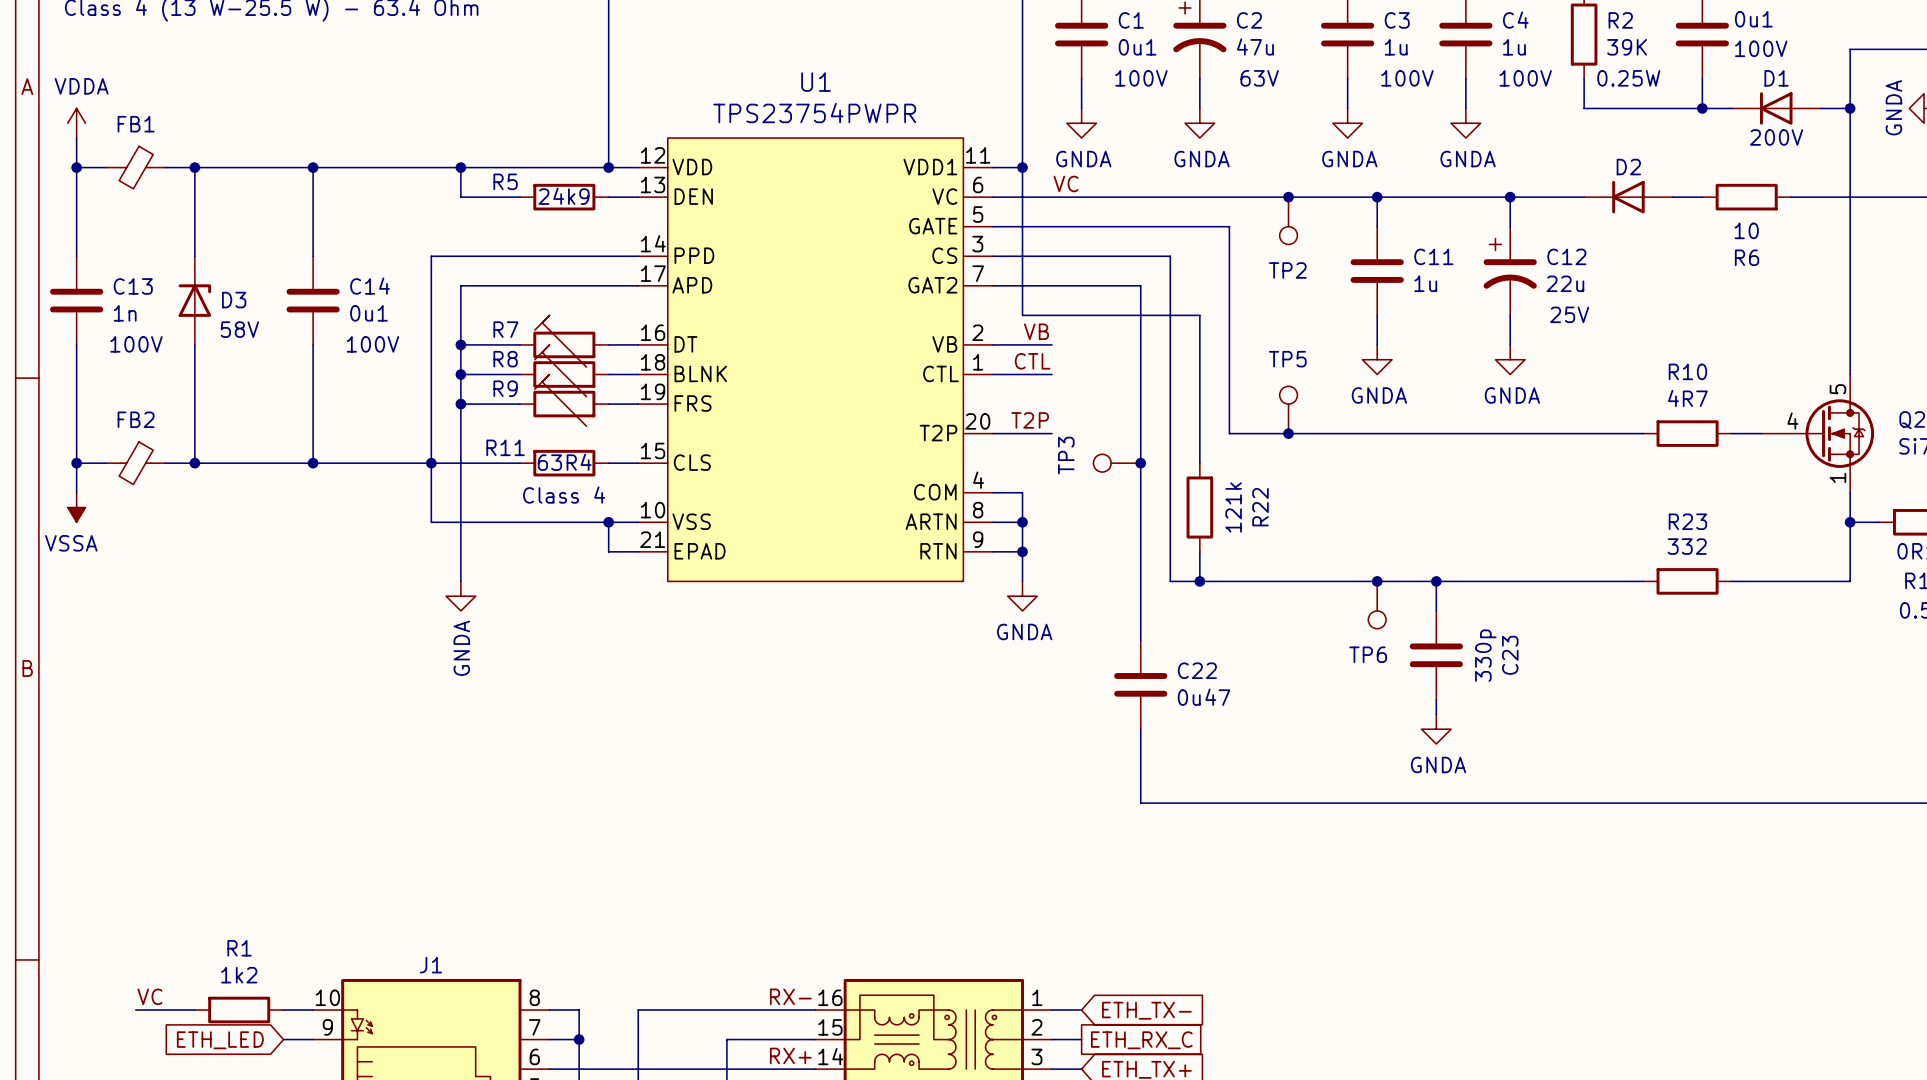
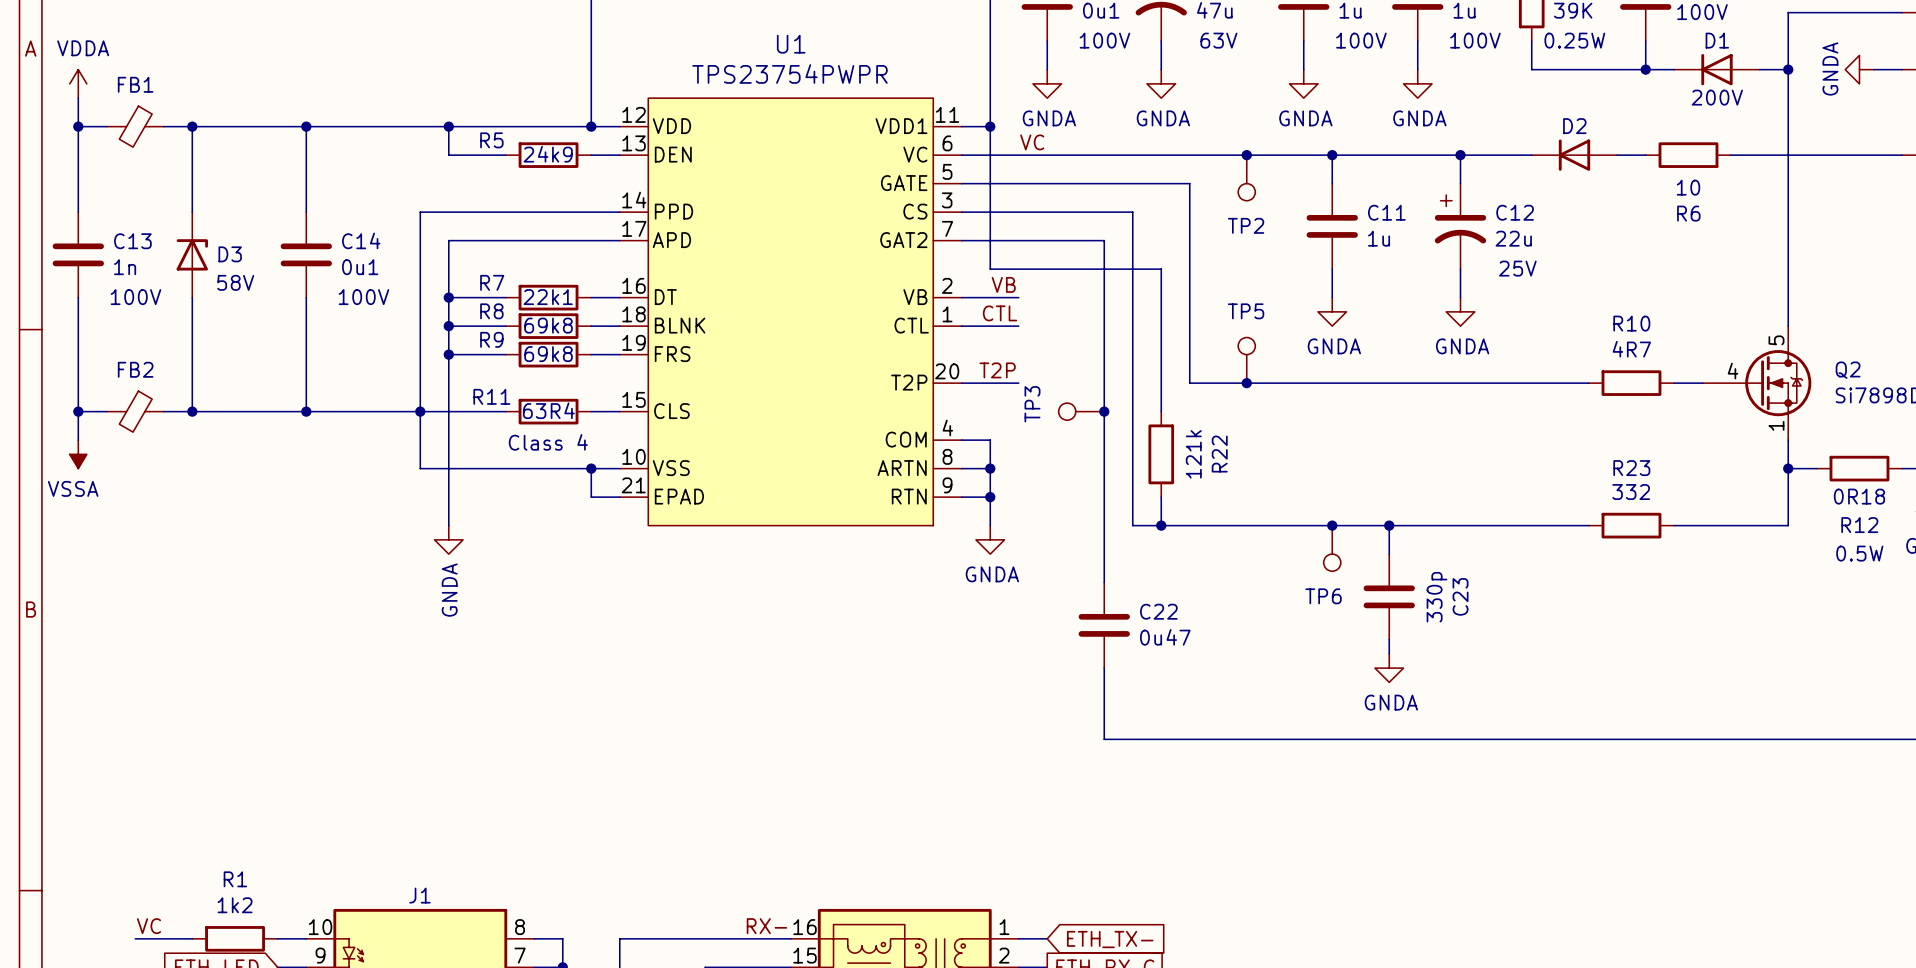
R7 symbol: [520, 315, 609, 368] -> [505, 284, 592, 311]
R8 symbol: [520, 344, 609, 397] -> [505, 313, 592, 339]
R7 value: none -> 22k1 (548, 297)
R8 value: none -> 69k8 (548, 325)
R9 symbol: [520, 374, 609, 427] -> [505, 341, 592, 368]
R9 value: none -> 69k8 (548, 354)

